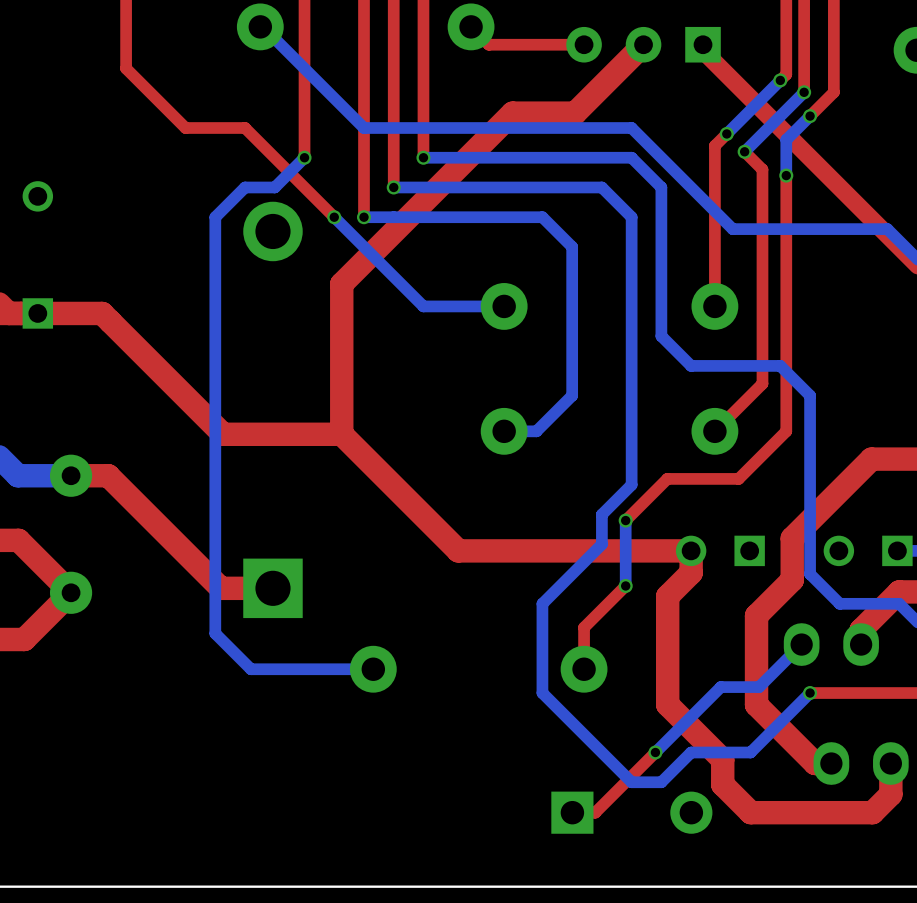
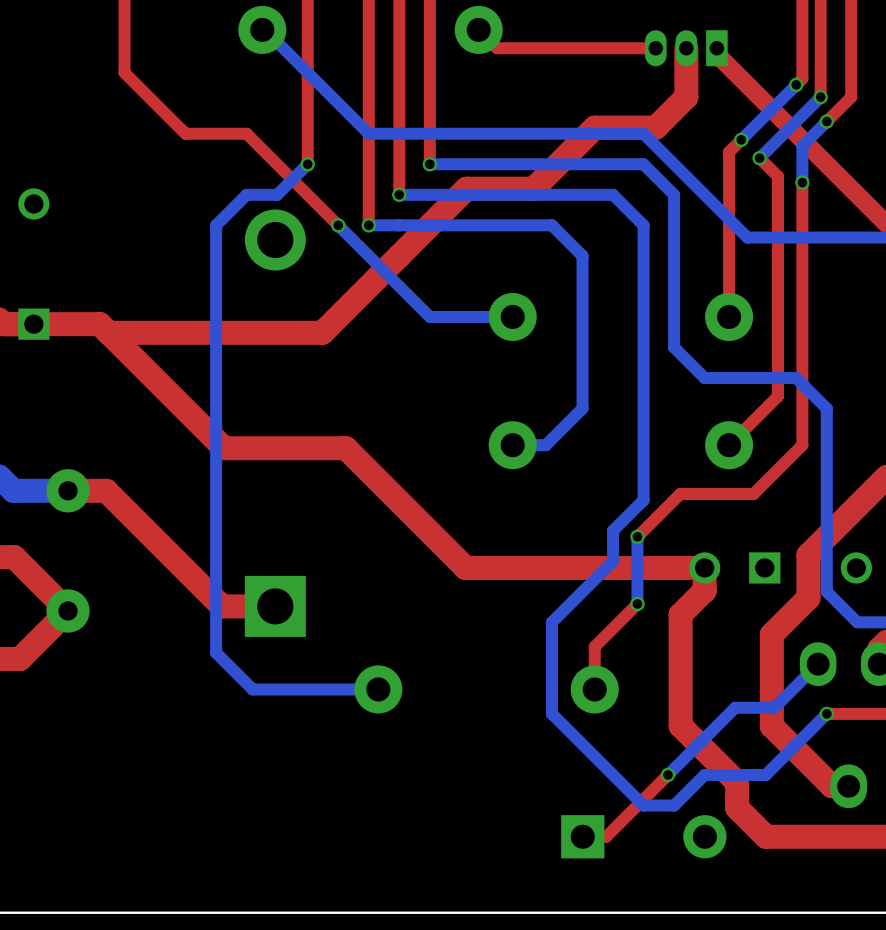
top track: (643, 44) (575, 113) (512, 113) (341, 284) (341, 434) -> (655, 48) (594, 48)
part: (643, 44) -> none
top track: none -> (686, 48) (686, 97) (655, 127) (594, 127) (533, 188) (466, 188) (322, 332) (108, 332)
part: none -> (686, 48)

